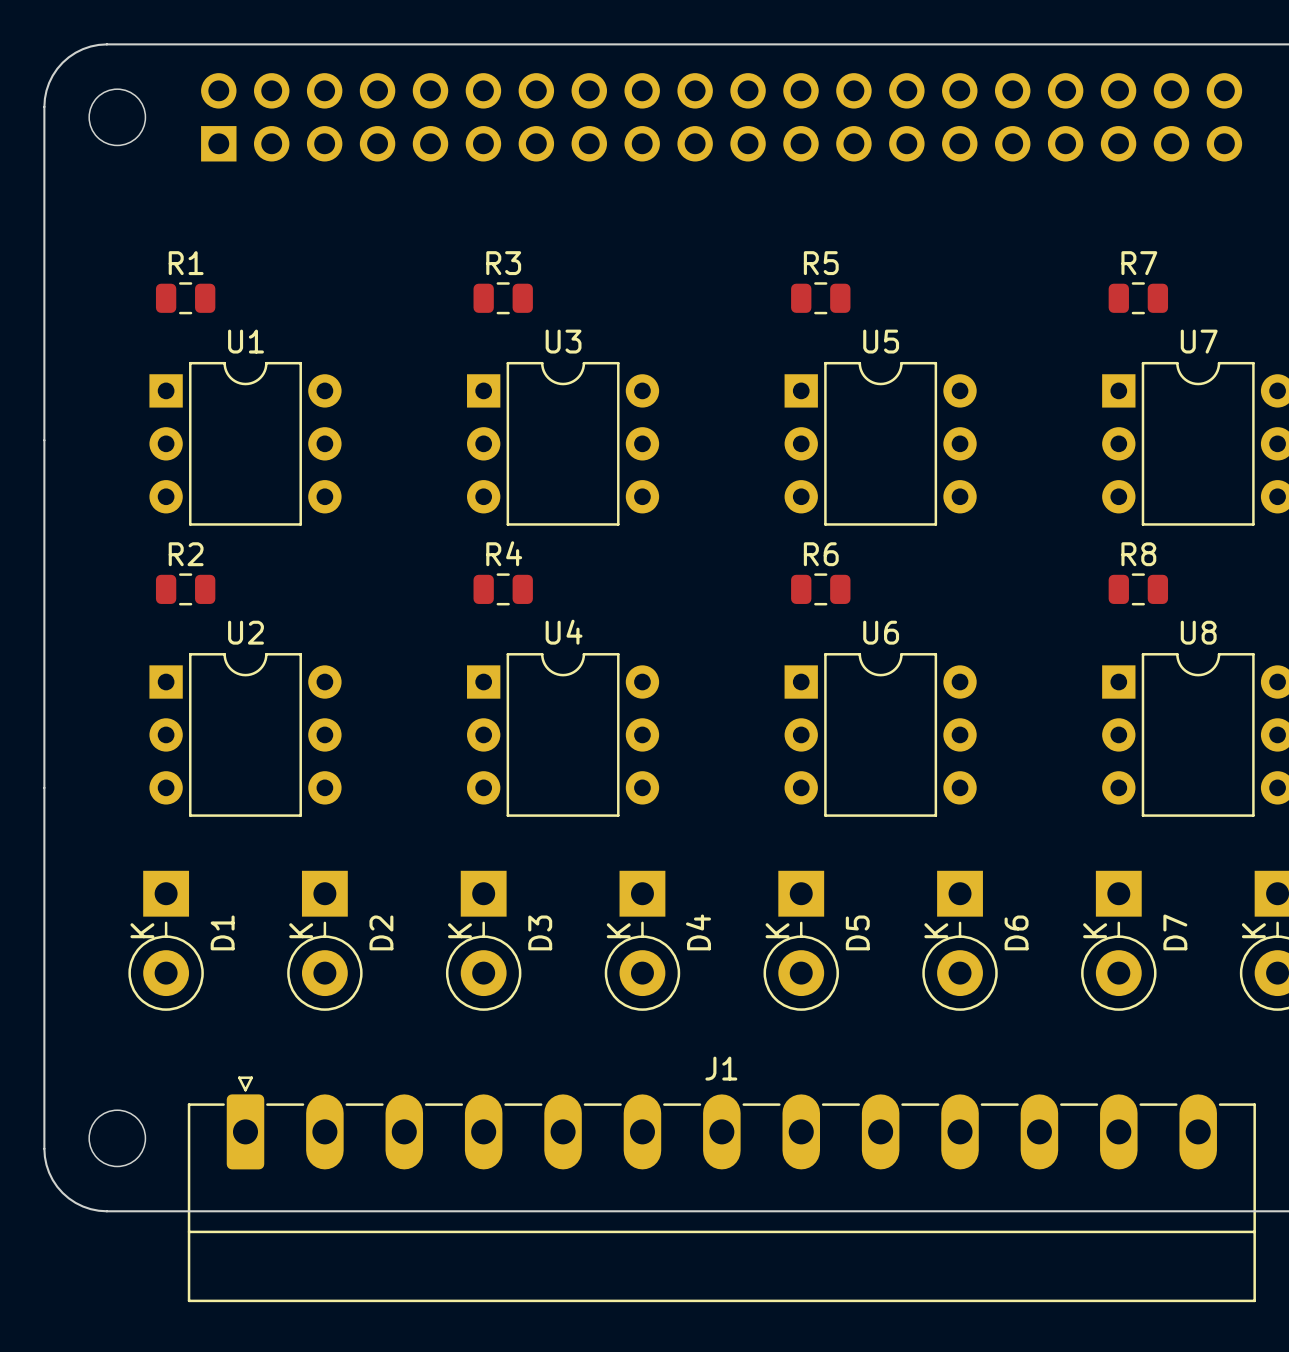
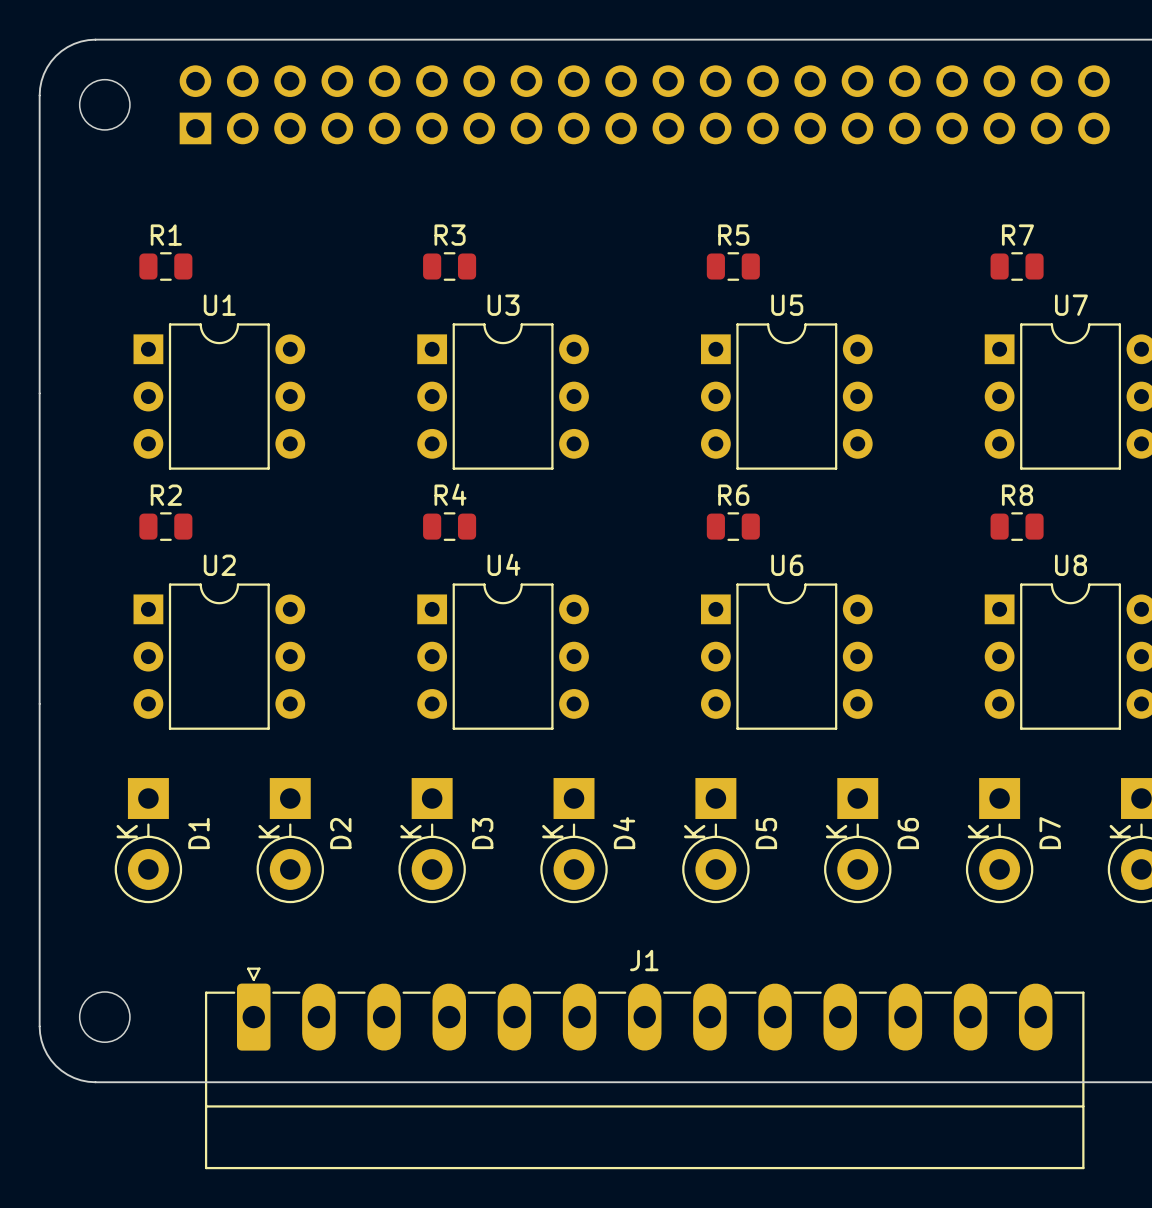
J1 footprint: [187, 1076, 1256, 1303] -> [204, 967, 1085, 1170]

